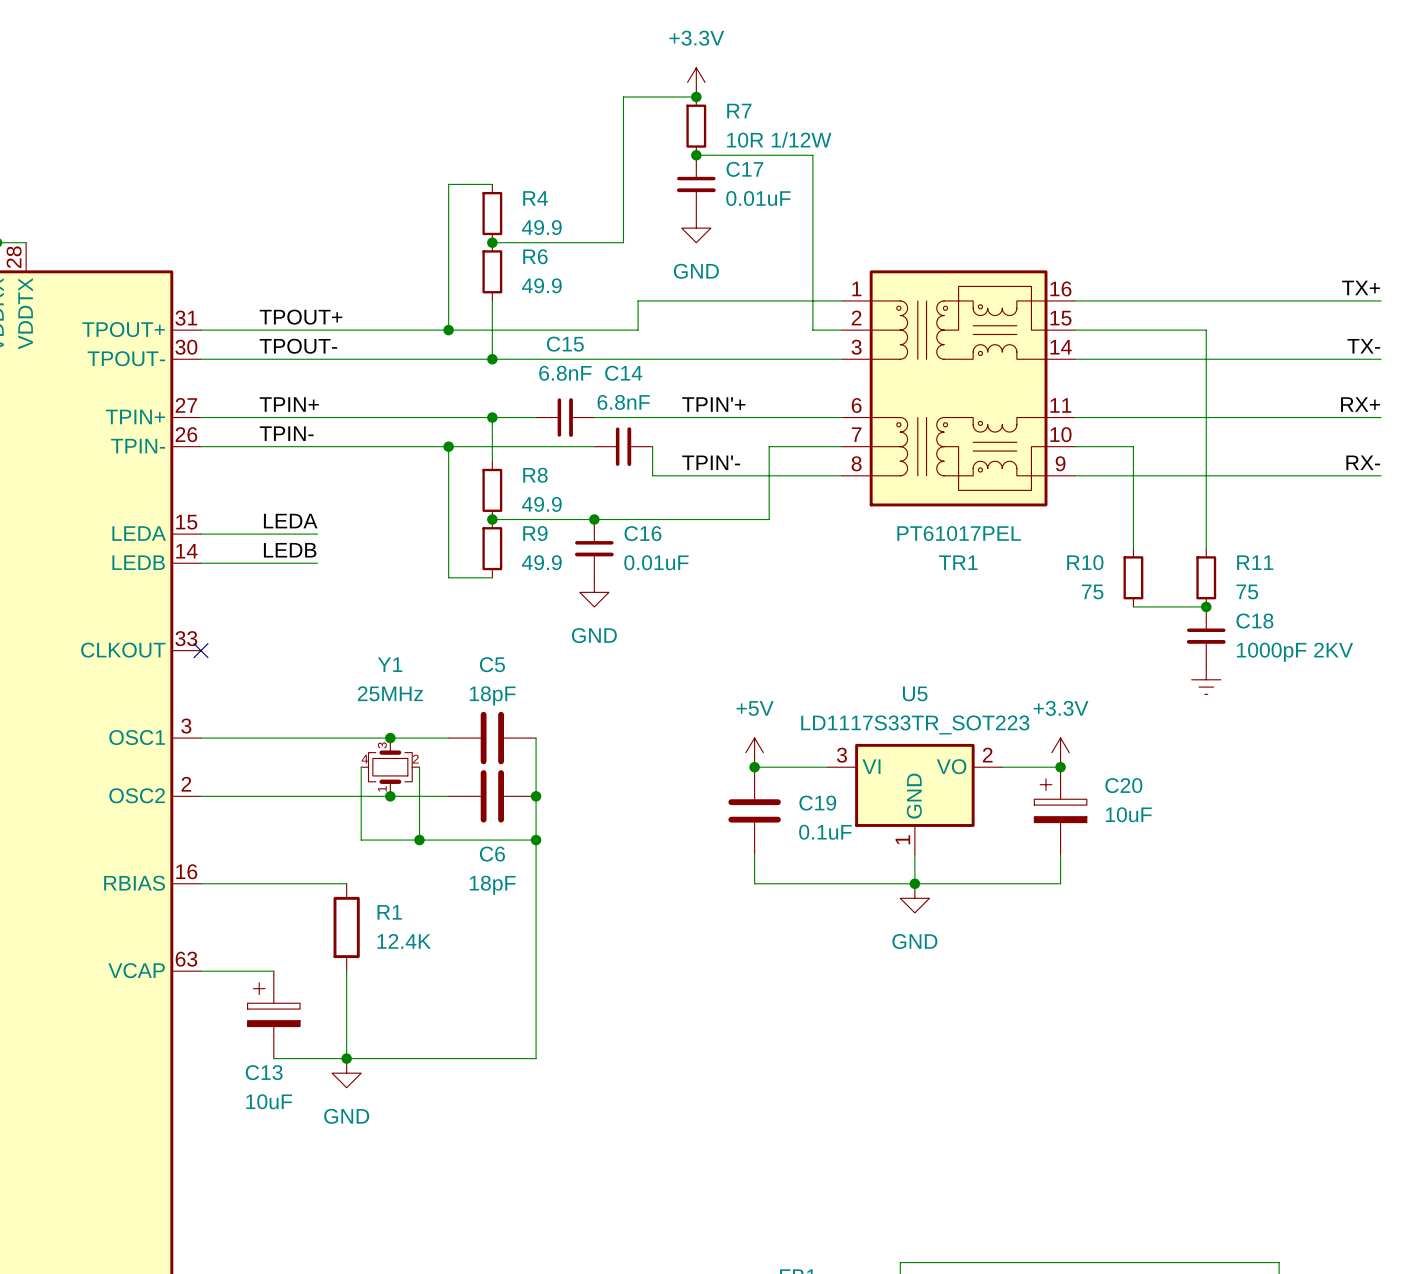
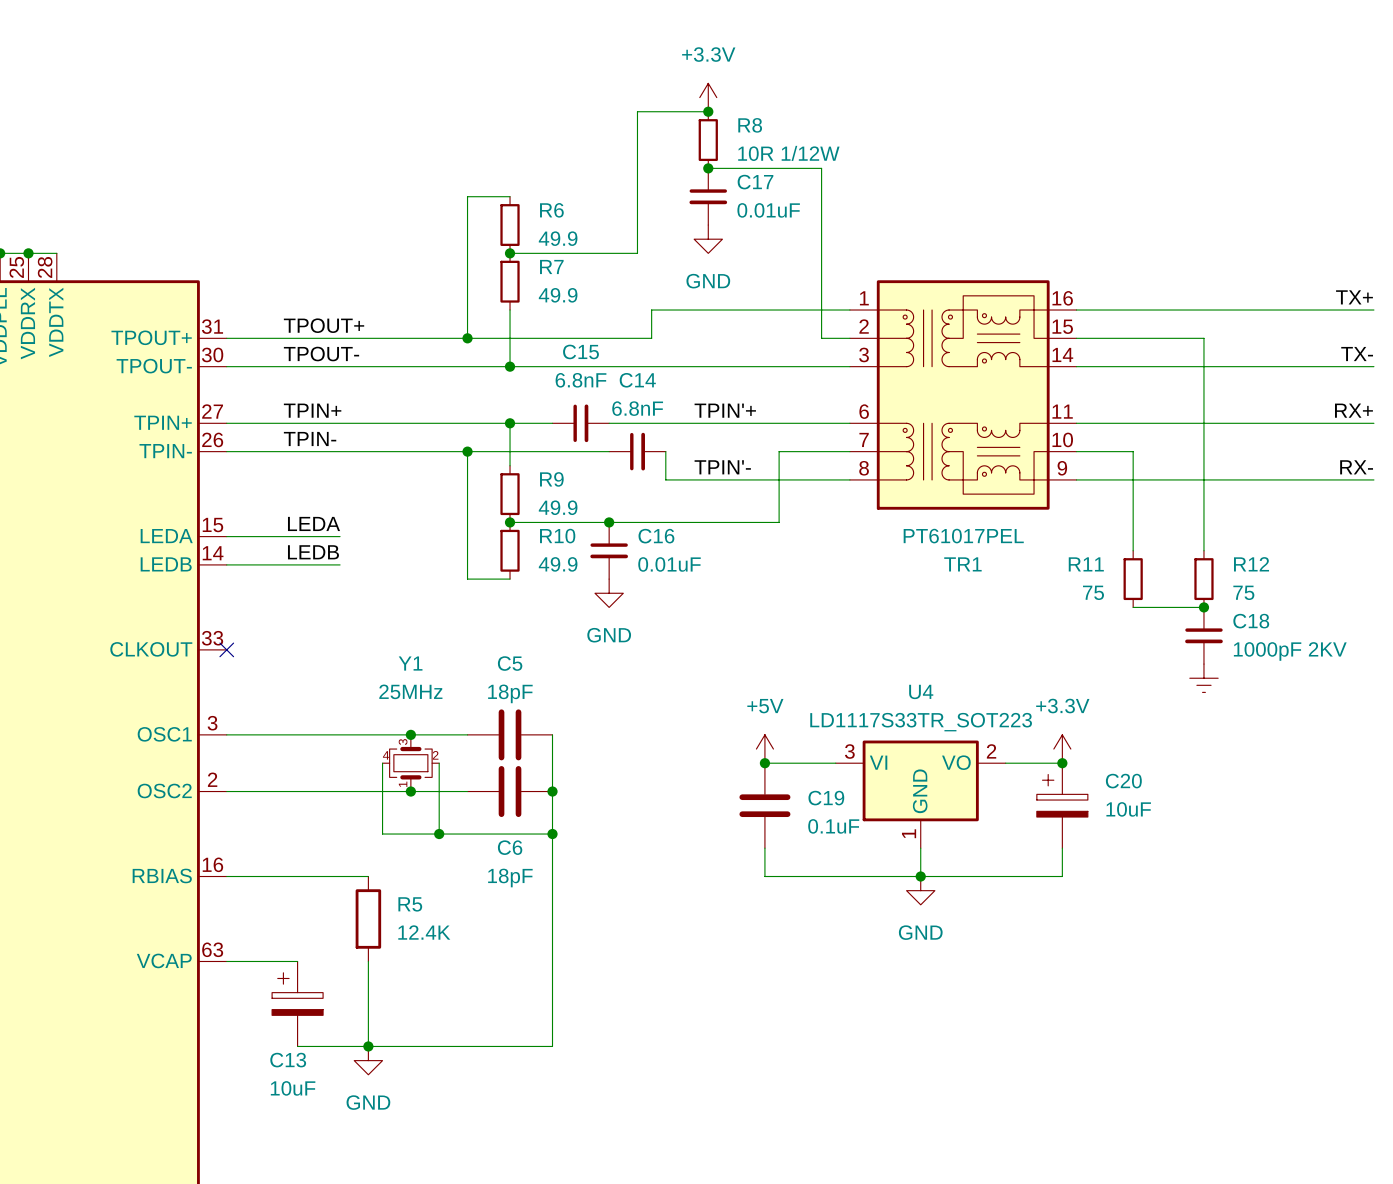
R7 name: R7 (739, 111) -> R8 (750, 125)
R4 name: R4 (535, 198) -> R6 (551, 210)
R6 name: R6 (535, 256) -> R7 (551, 266)
R8 name: R8 (535, 475) -> R9 (551, 479)
R9 name: R9 (535, 533) -> R10 (557, 536)
R10 name: R10 (1085, 562) -> R11 (1086, 564)
R11 name: R11 (1255, 562) -> R12 (1251, 564)
U5 name: U5 (915, 693) -> U4 (921, 691)
R1 name: R1 (389, 912) -> R5 (410, 904)

